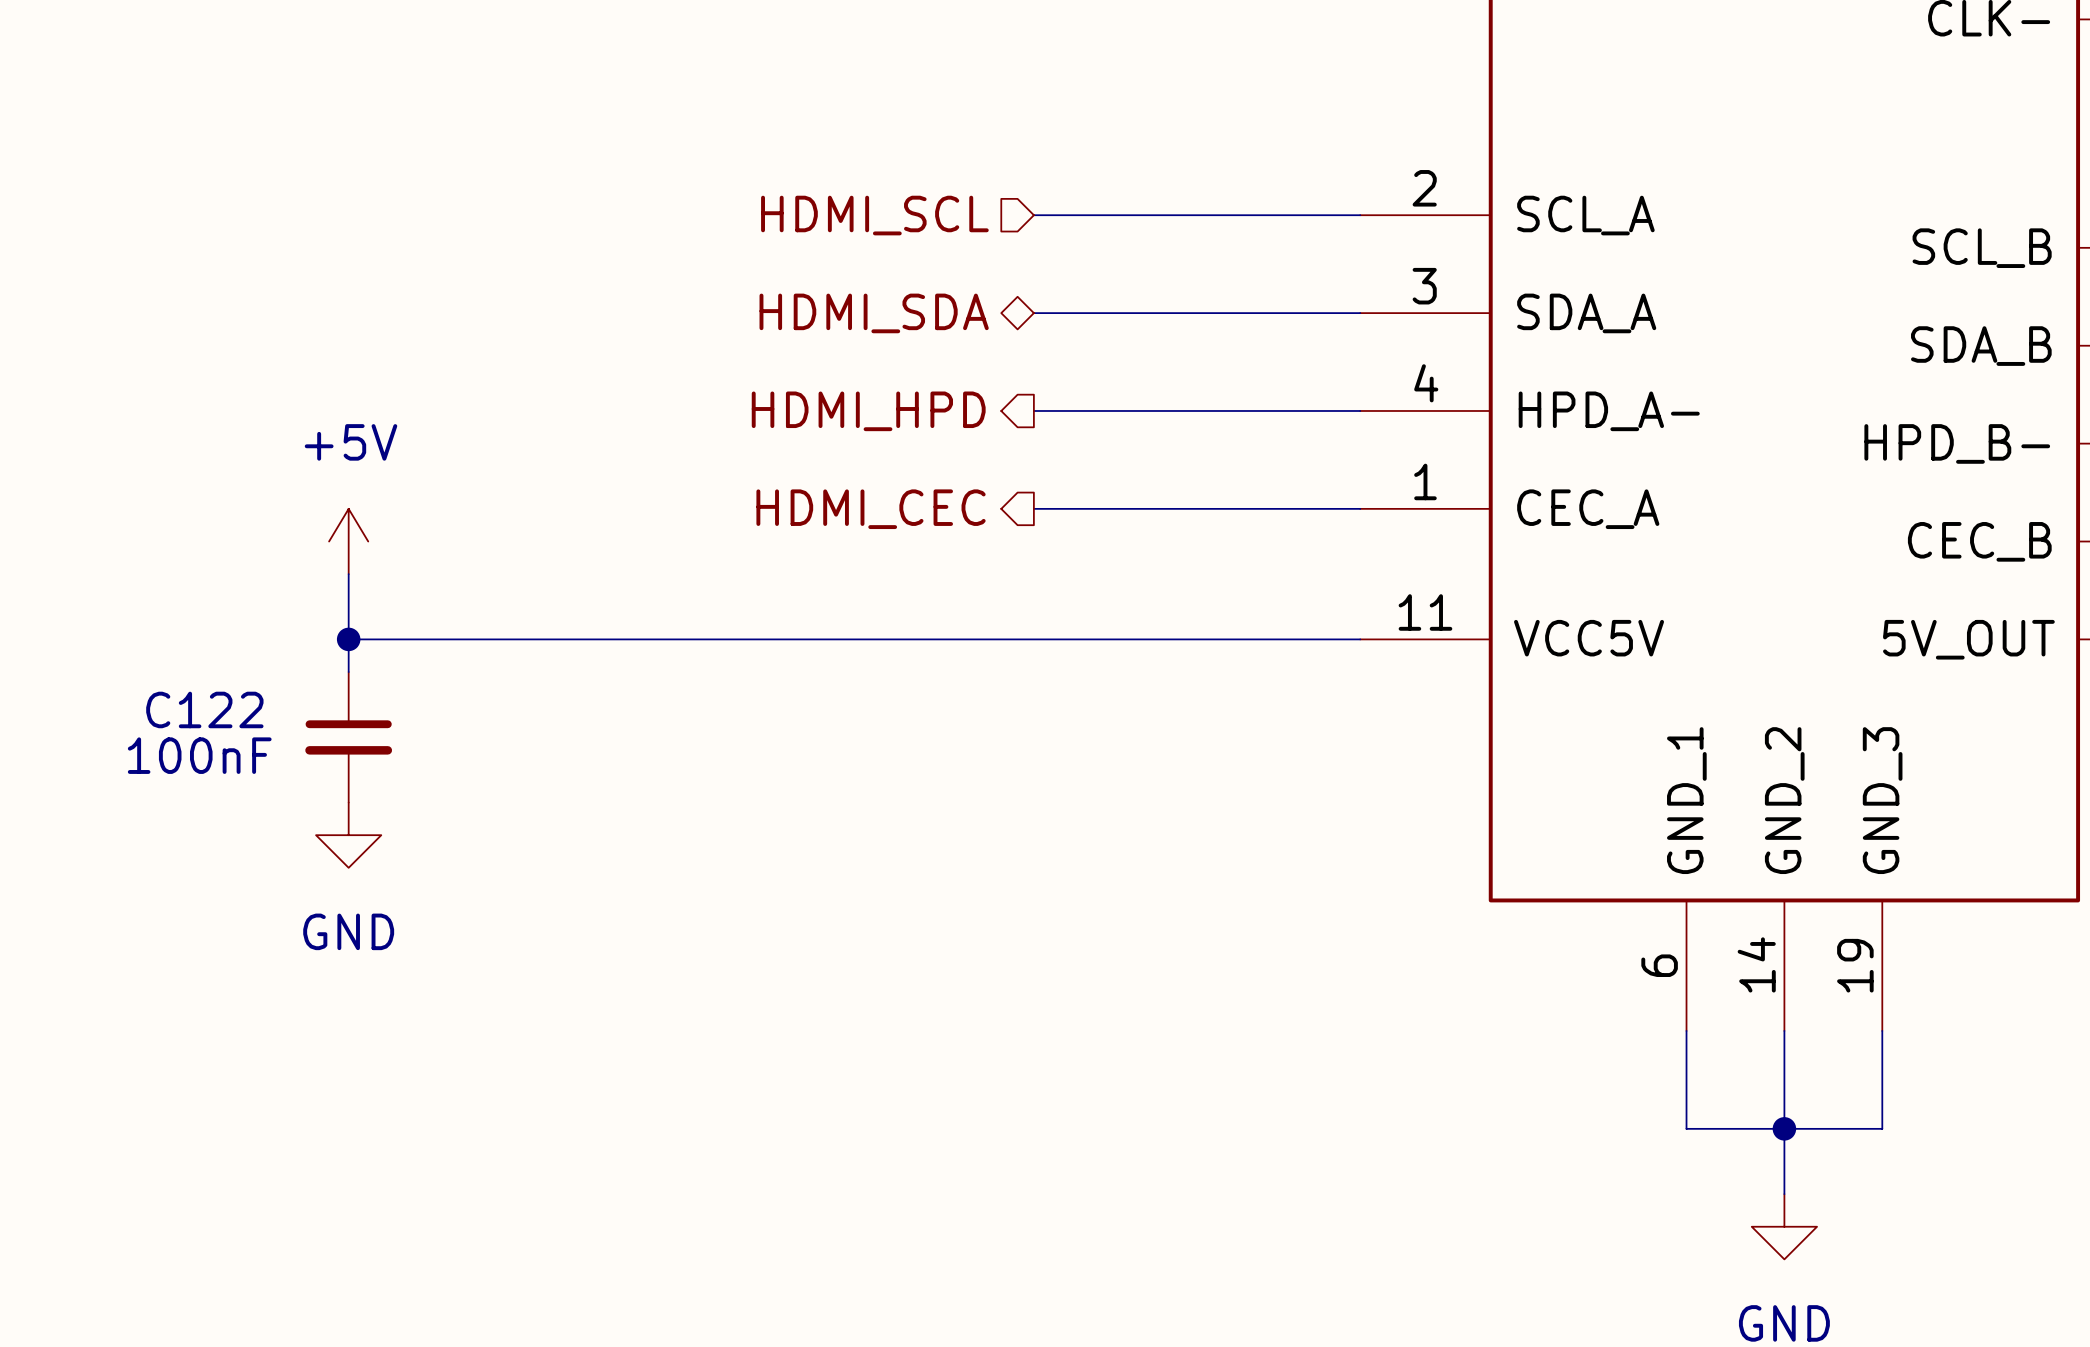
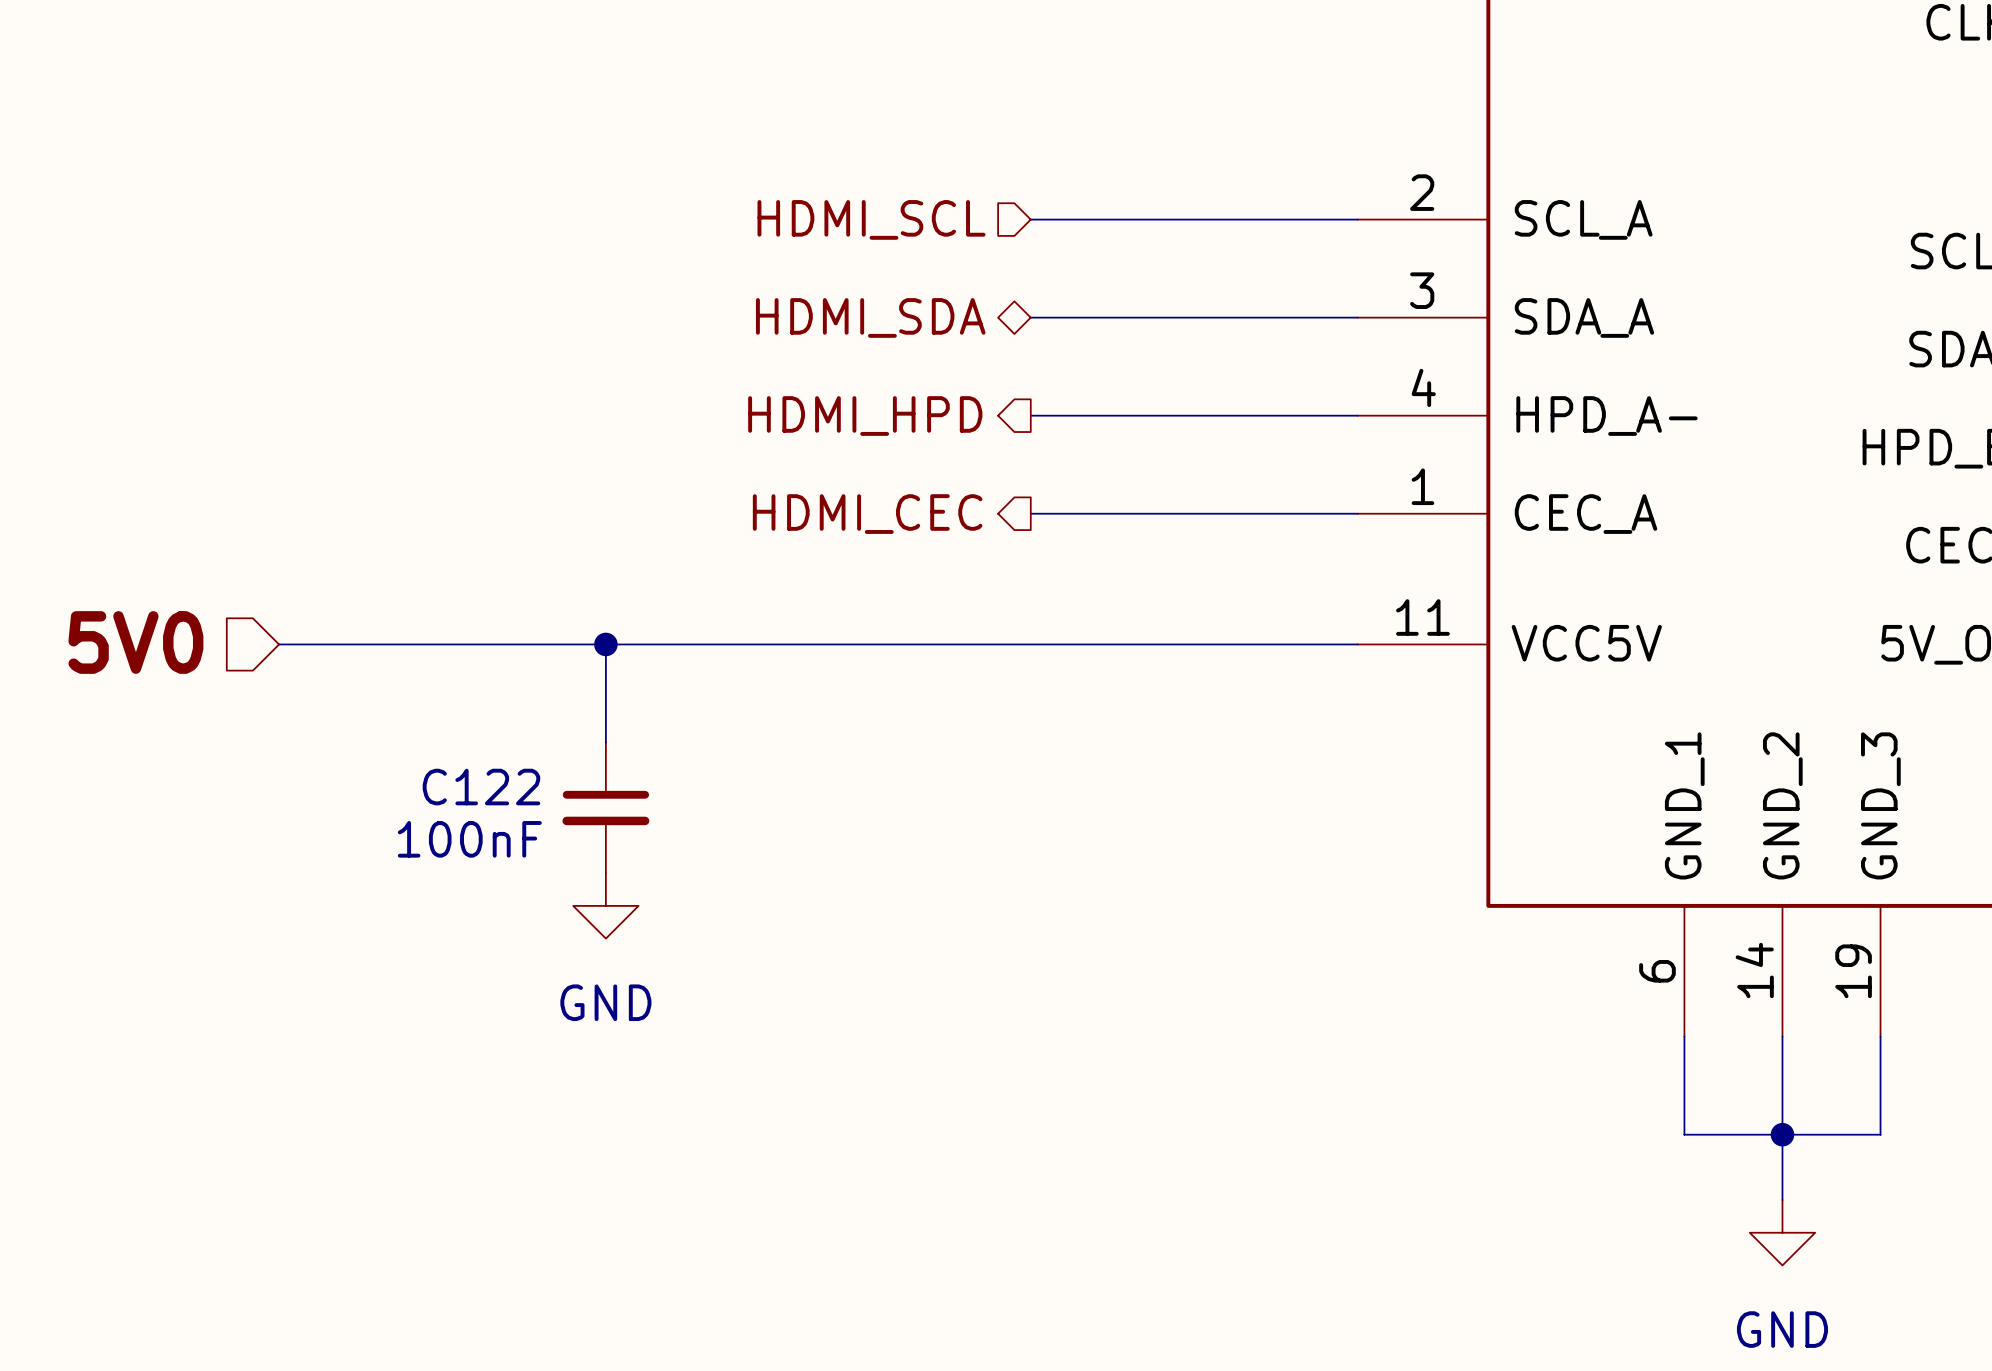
power symbol: +5V (348, 541) -> none
wire: (348, 574) (348, 672) -> (605, 644) (605, 742)
hierarchical label: none -> 5V0 (135, 642)
wire: none -> (279, 644) (344, 644)
junction: (348, 639) -> none
junction: none -> (605, 644)
C122 name position: C122 (204, 709) -> C122 (481, 787)
C122 position: (348, 737) -> (605, 807)
C122 value position: 100nF (199, 755) -> 100nF (469, 839)
power symbol position: GND (348, 835) -> GND (605, 905)

